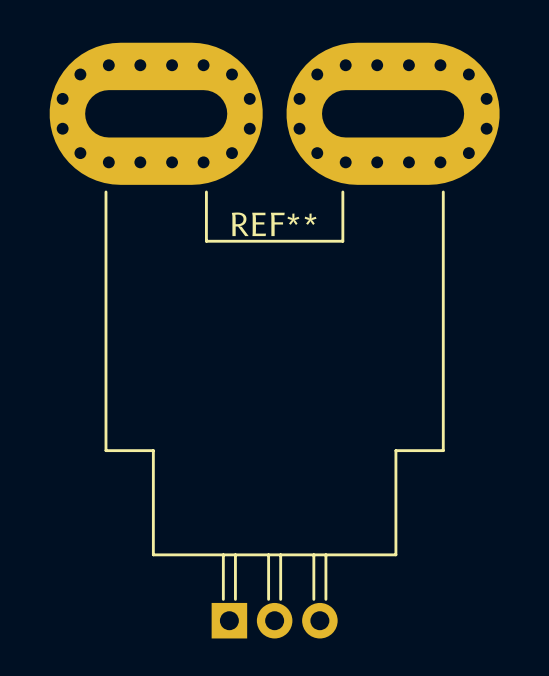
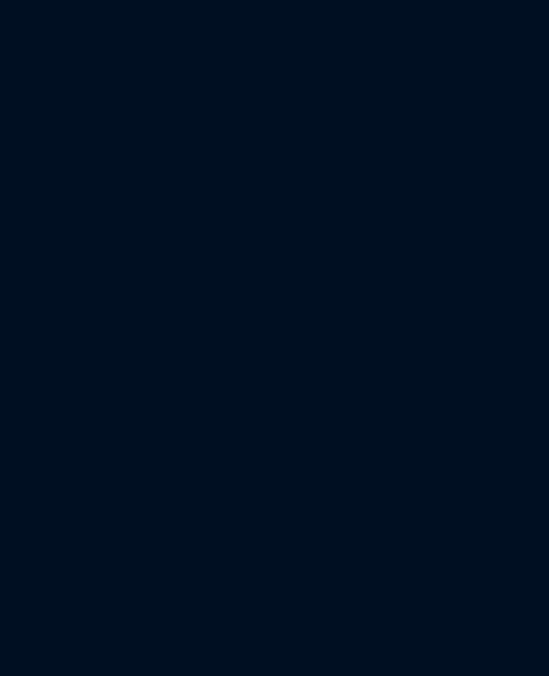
REF**: (274, 340) -> none

